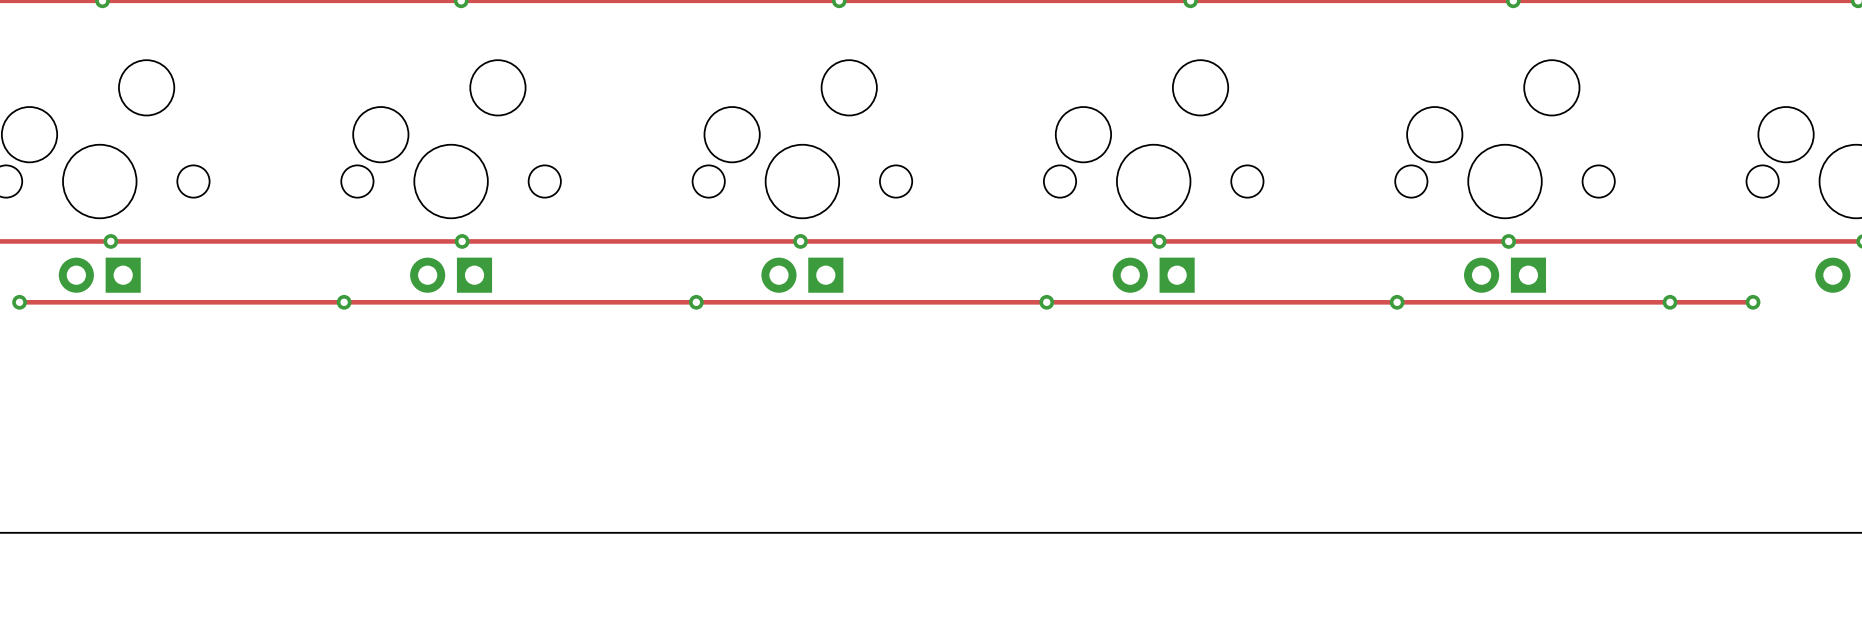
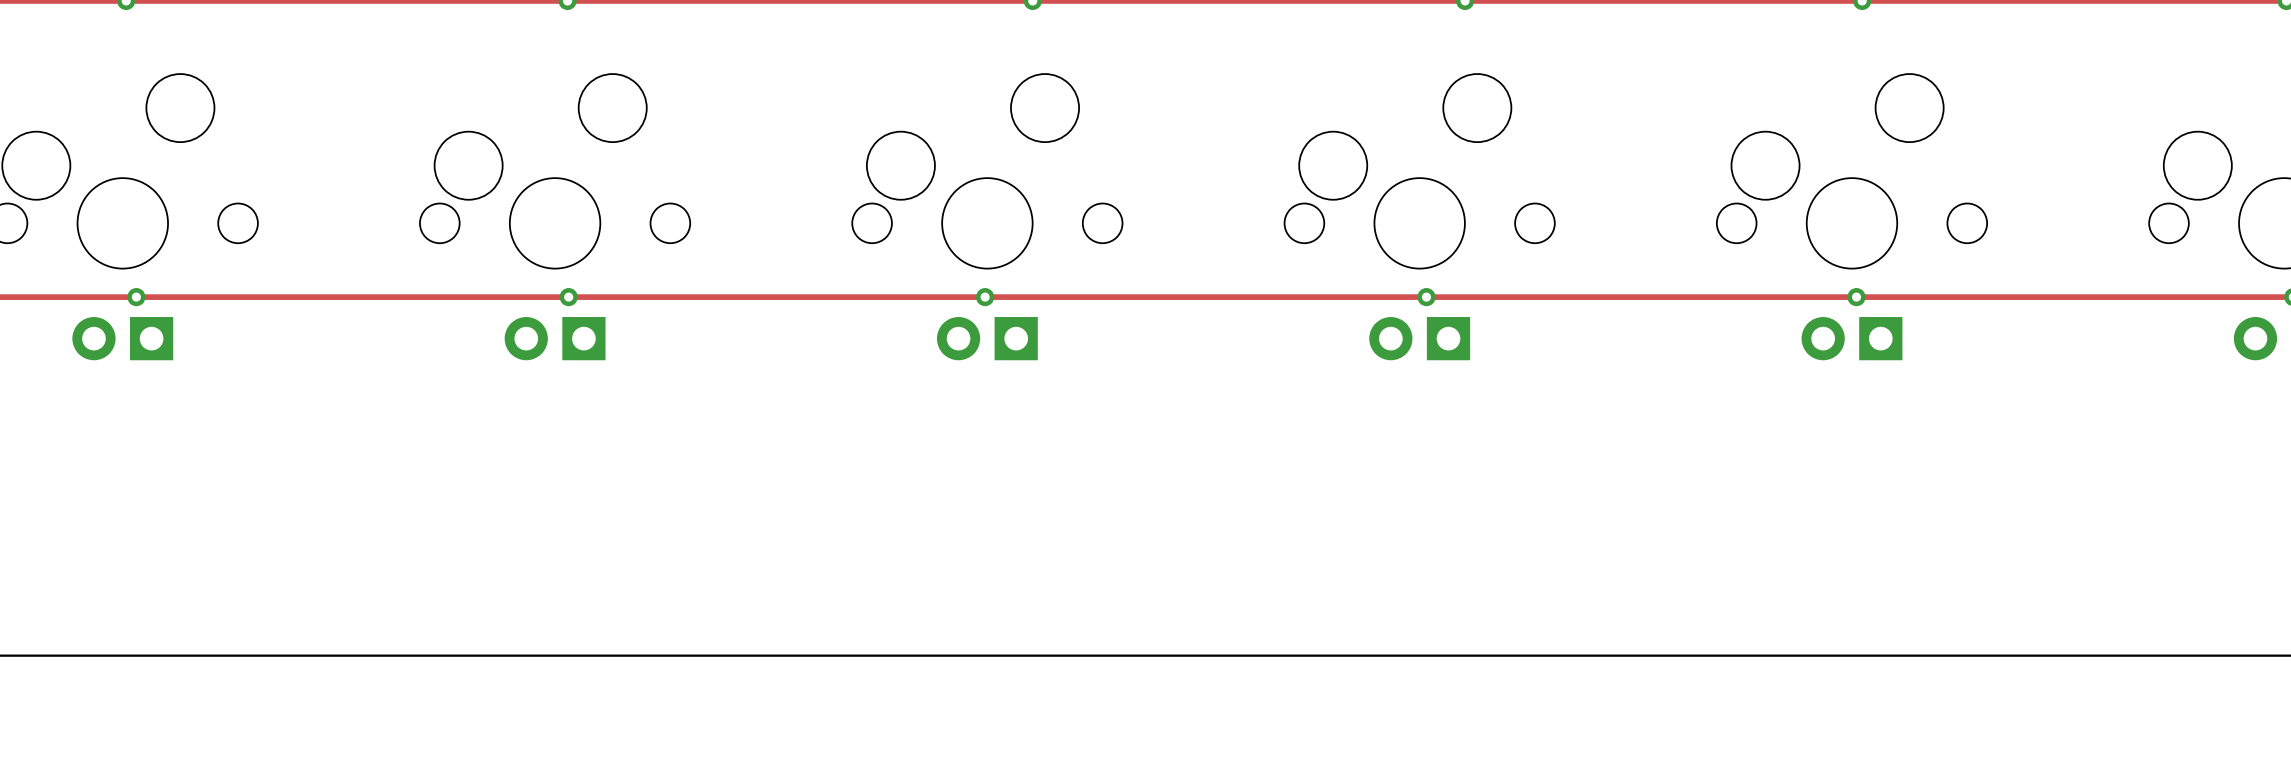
track: (19, 302) (1753, 302) -> none
via: (19, 302) -> none
via: (344, 302) -> none
via: (696, 302) -> none
via: (1046, 302) -> none
via: (1397, 302) -> none
via: (1670, 302) -> none
via: (1753, 302) -> none

